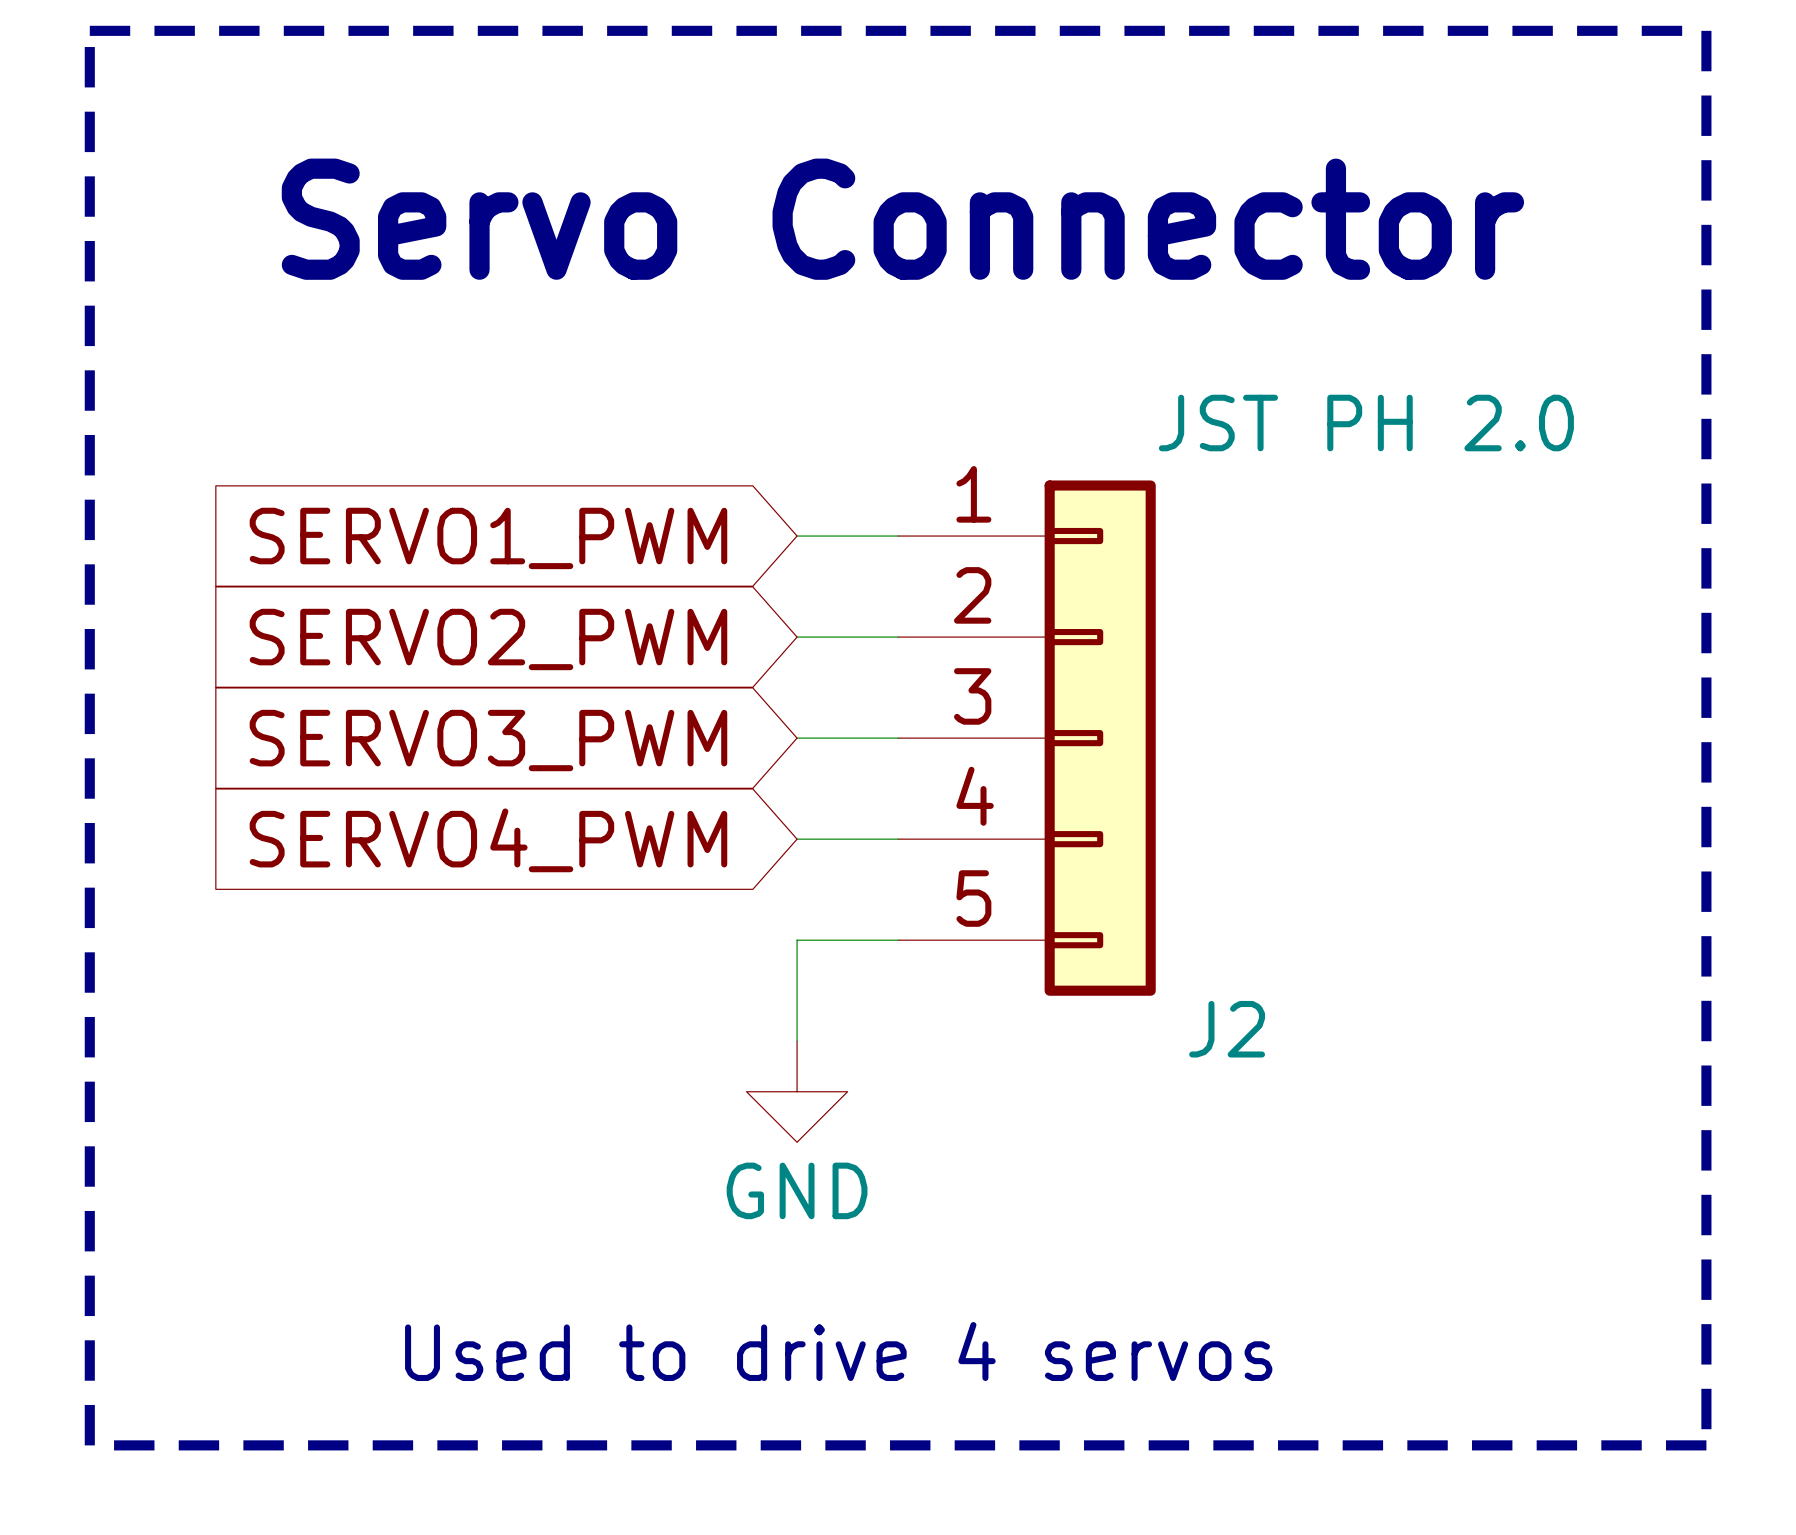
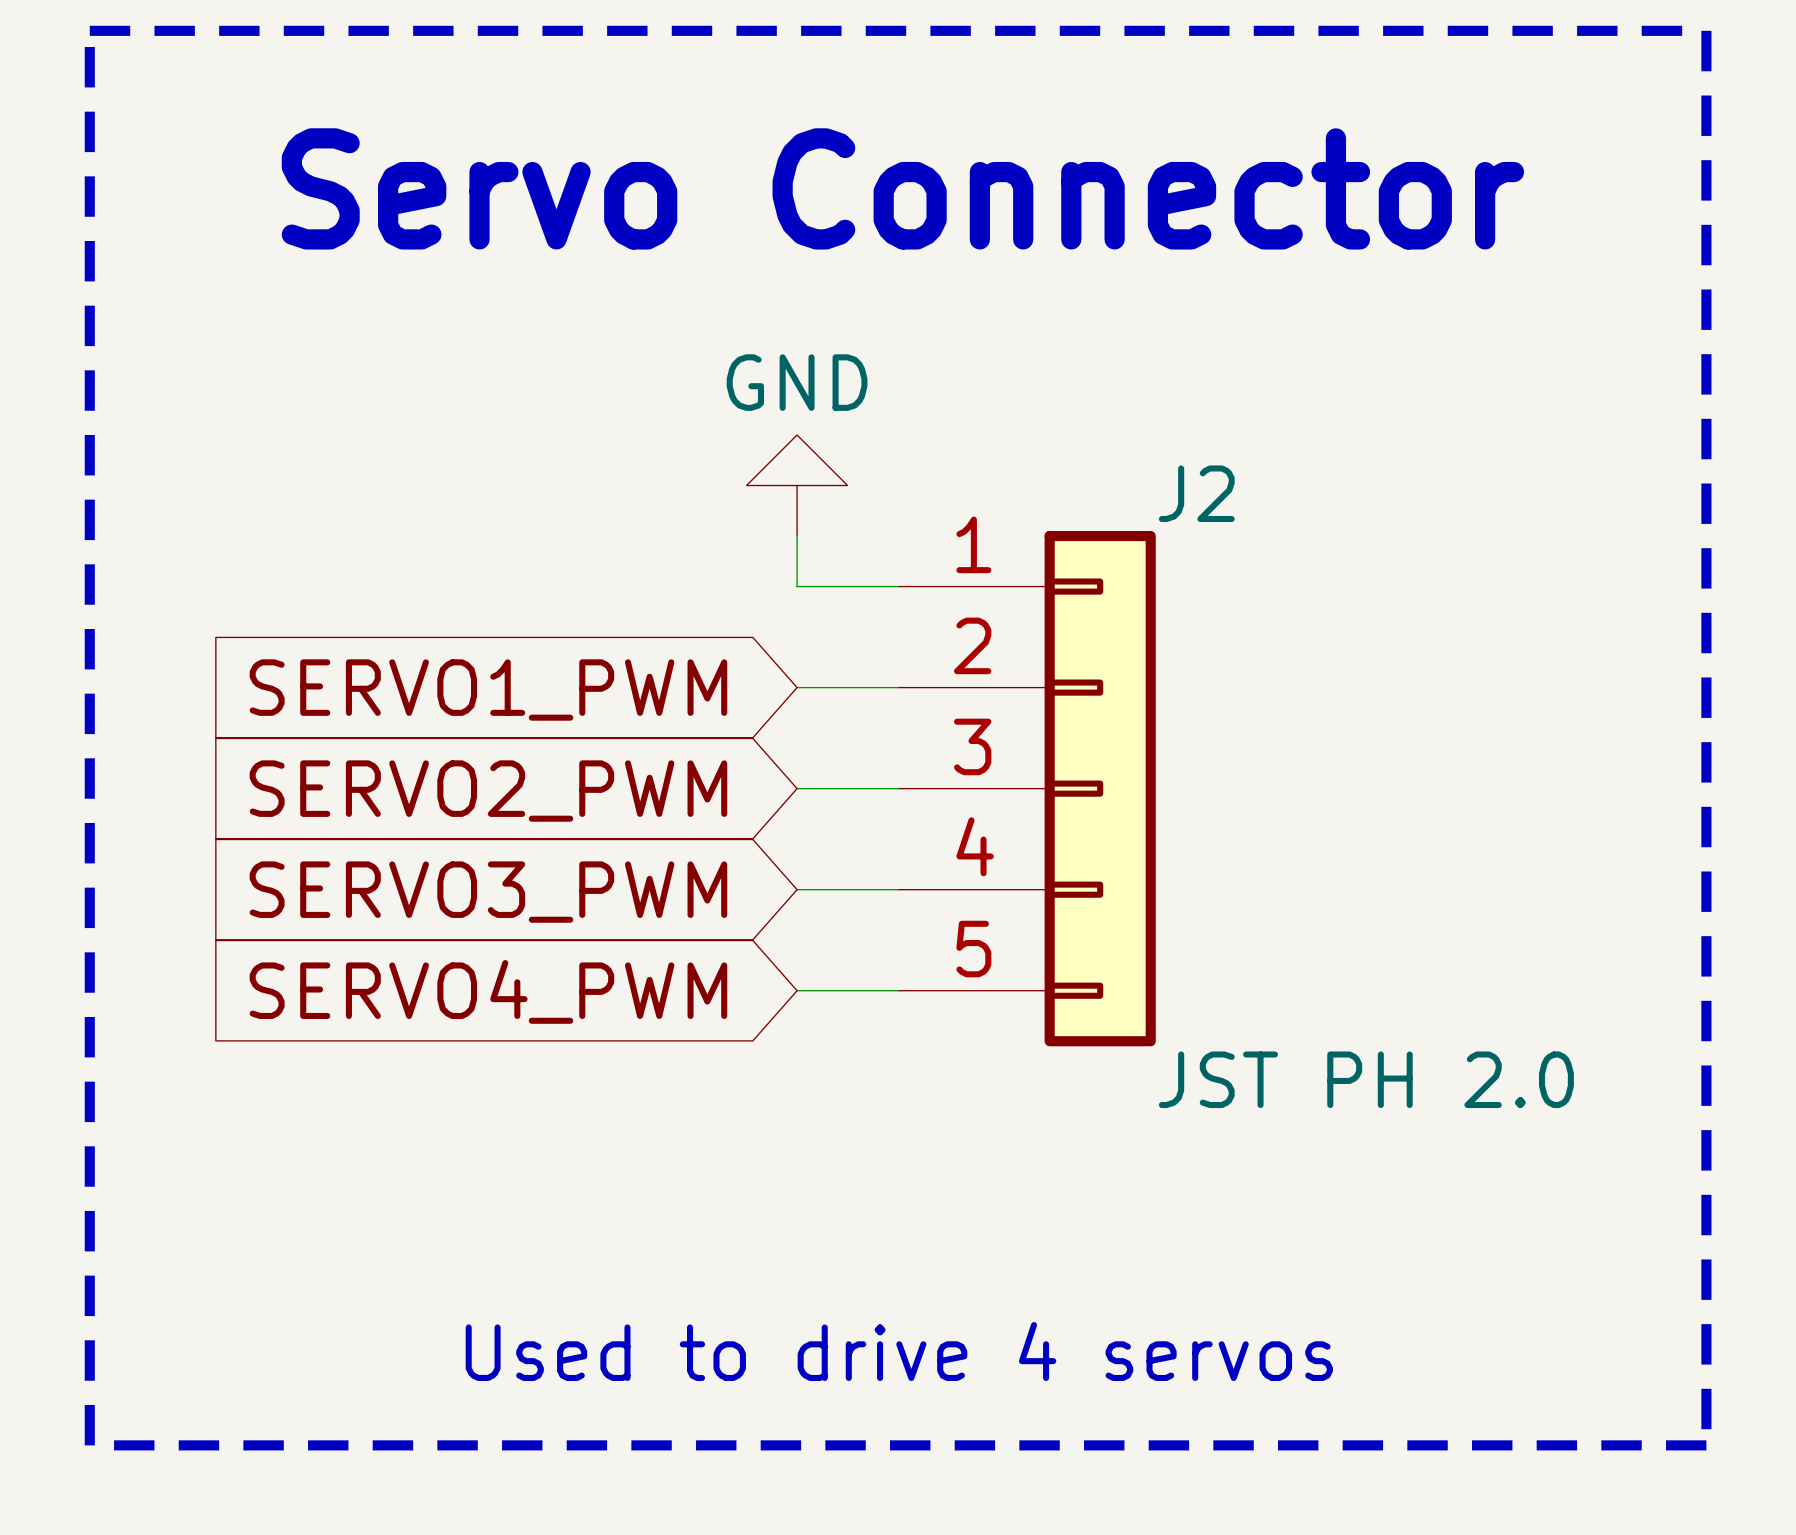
text position: Servo Connector (902, 219) -> Servo Connector (902, 188)
J2 value position: JST PH 2.0 (1366, 423) -> JST PH 2.0 (1366, 1079)
wire: (797, 536) (898, 536) -> (797, 536) (797, 586) (898, 586)
global label position: SERVO1_PWM (488, 538) -> SERVO1_PWM (488, 690)
wire: (797, 637) (898, 637) -> (797, 788) (898, 788)
global label position: SERVO2_PWM (488, 639) -> SERVO2_PWM (488, 791)
wire: none -> (797, 687) (898, 687)
wire: (797, 738) (898, 738) -> (797, 889) (898, 889)
J2 position: (1026, 738) -> (1026, 788)
global label position: SERVO3_PWM (488, 740) -> SERVO3_PWM (488, 892)
wire: (797, 839) (898, 839) -> (797, 990) (898, 990)
global label position: SERVO4_PWM (488, 840) -> SERVO4_PWM (488, 991)
wire: (898, 940) (797, 940) (797, 1041) -> none
J2 name position: J2 (1227, 1029) -> J2 (1196, 493)
power symbol rotation: 0° (797, 1091) -> 180° (797, 485)
power symbol position: GND (797, 1091) -> GND (797, 485)
text position: Used to drive 4 servos (838, 1351) -> Used to drive 4 servos (899, 1351)

